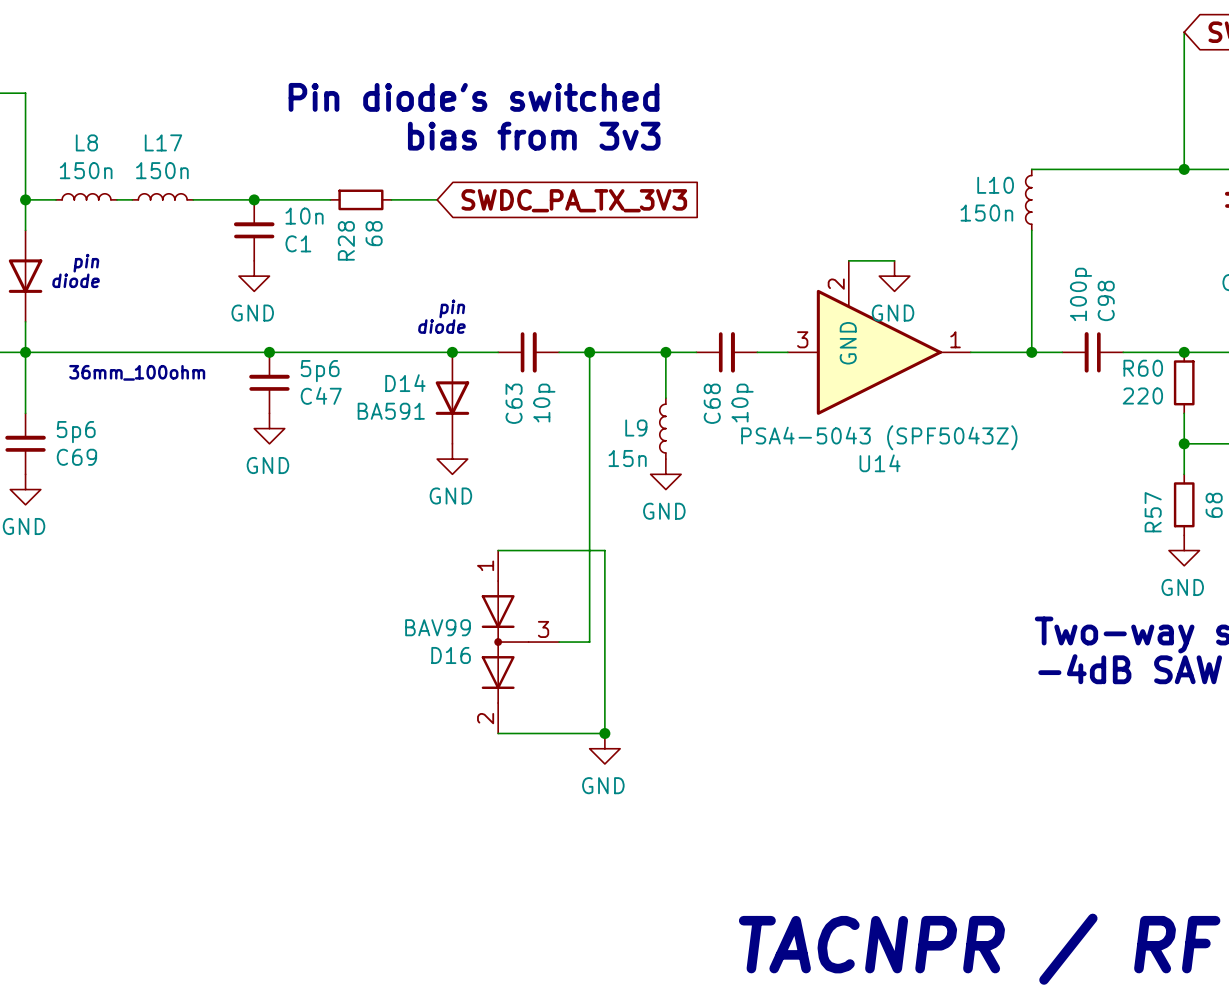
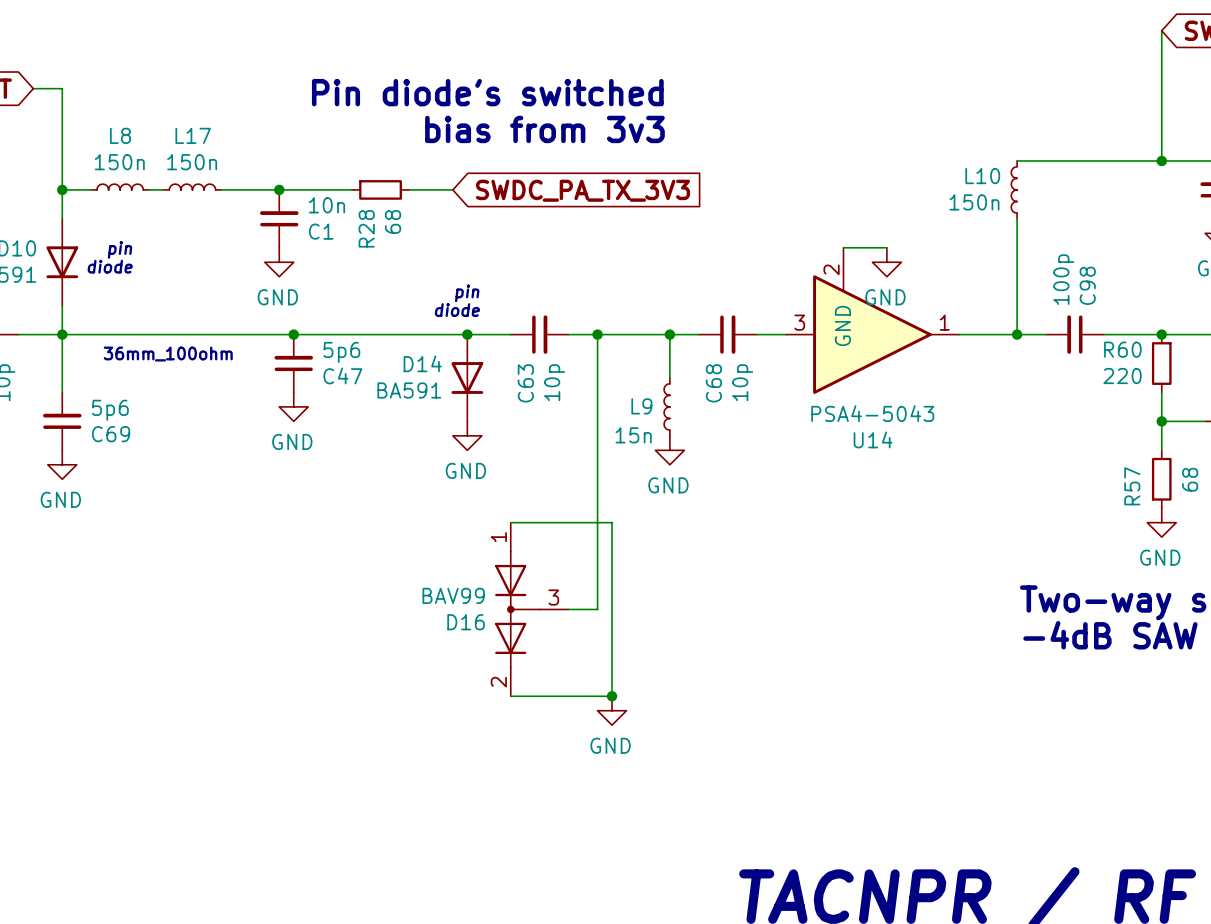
U14 value: PSA4-5043 (SPF5043Z) (879, 437) -> PSA4-5043 (872, 413)

